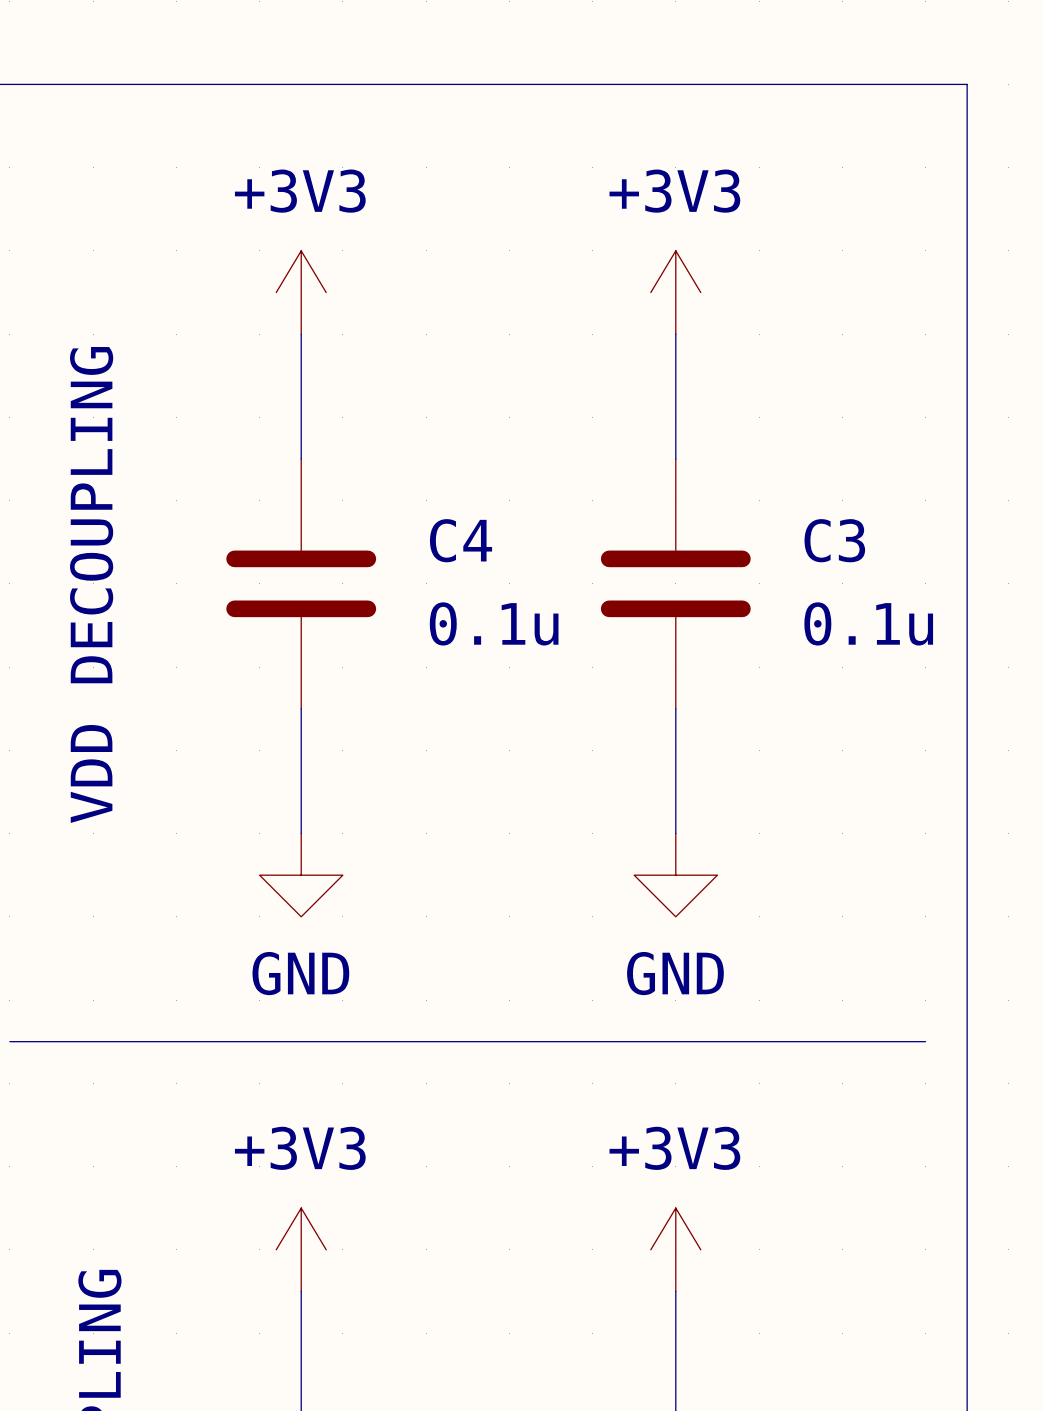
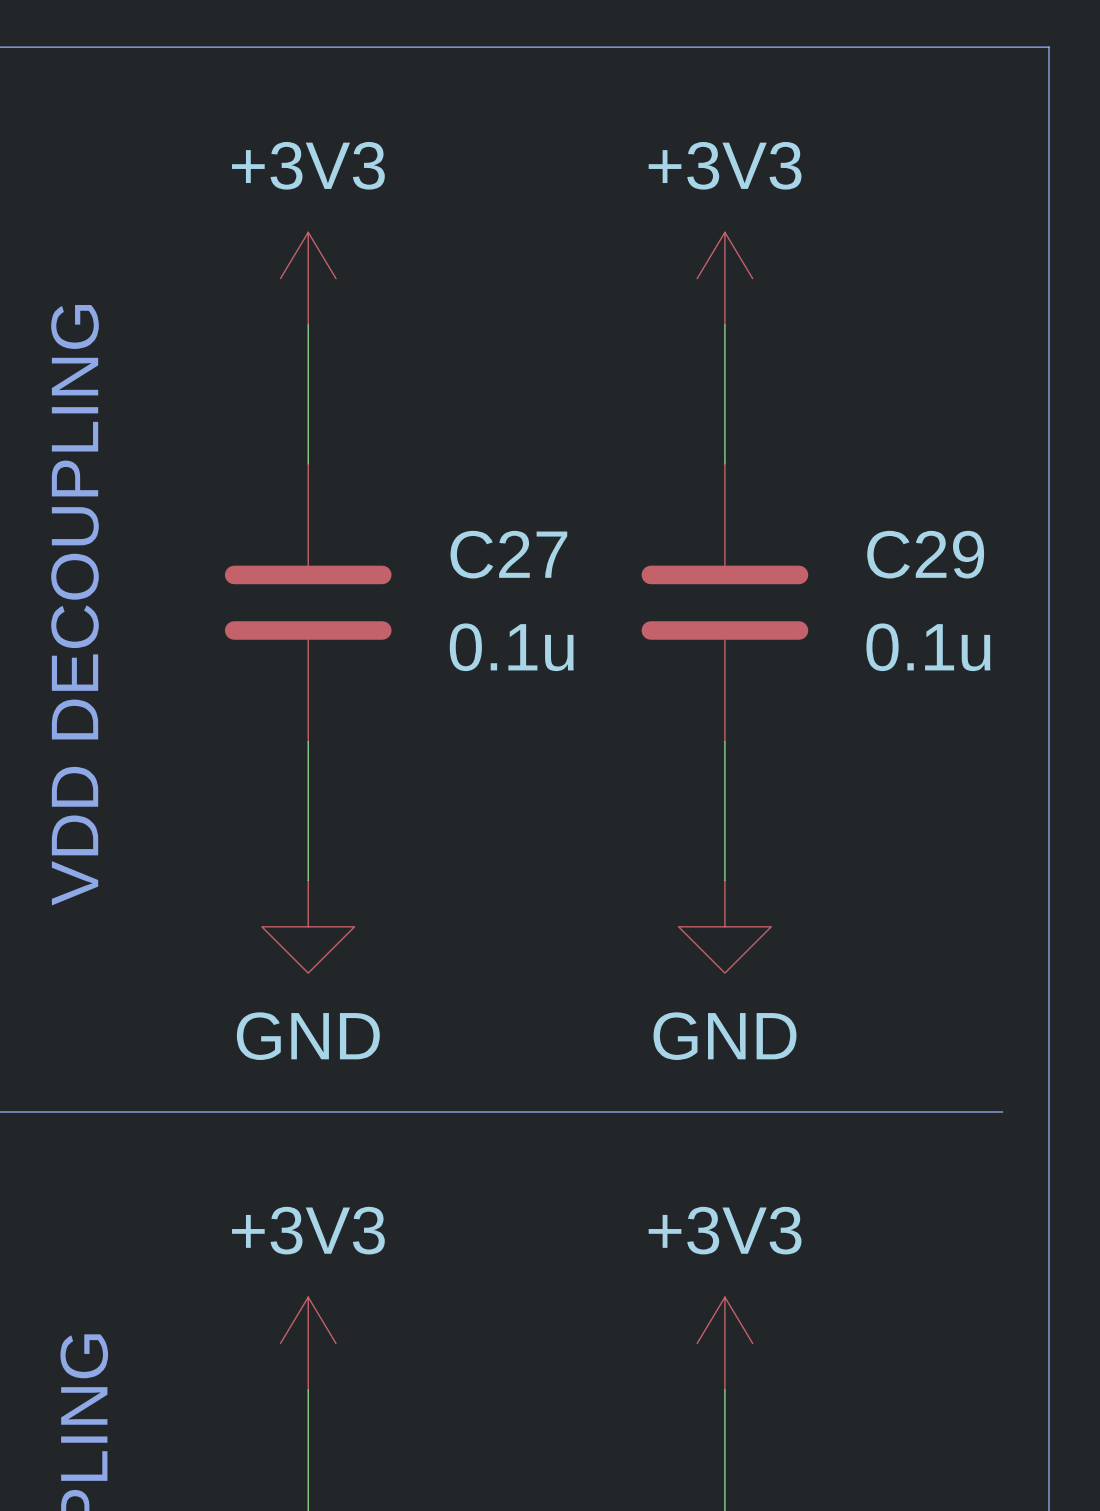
C4 name: C4 (461, 540) -> C27 (508, 554)
C3 name: C3 (834, 540) -> C29 (925, 554)

